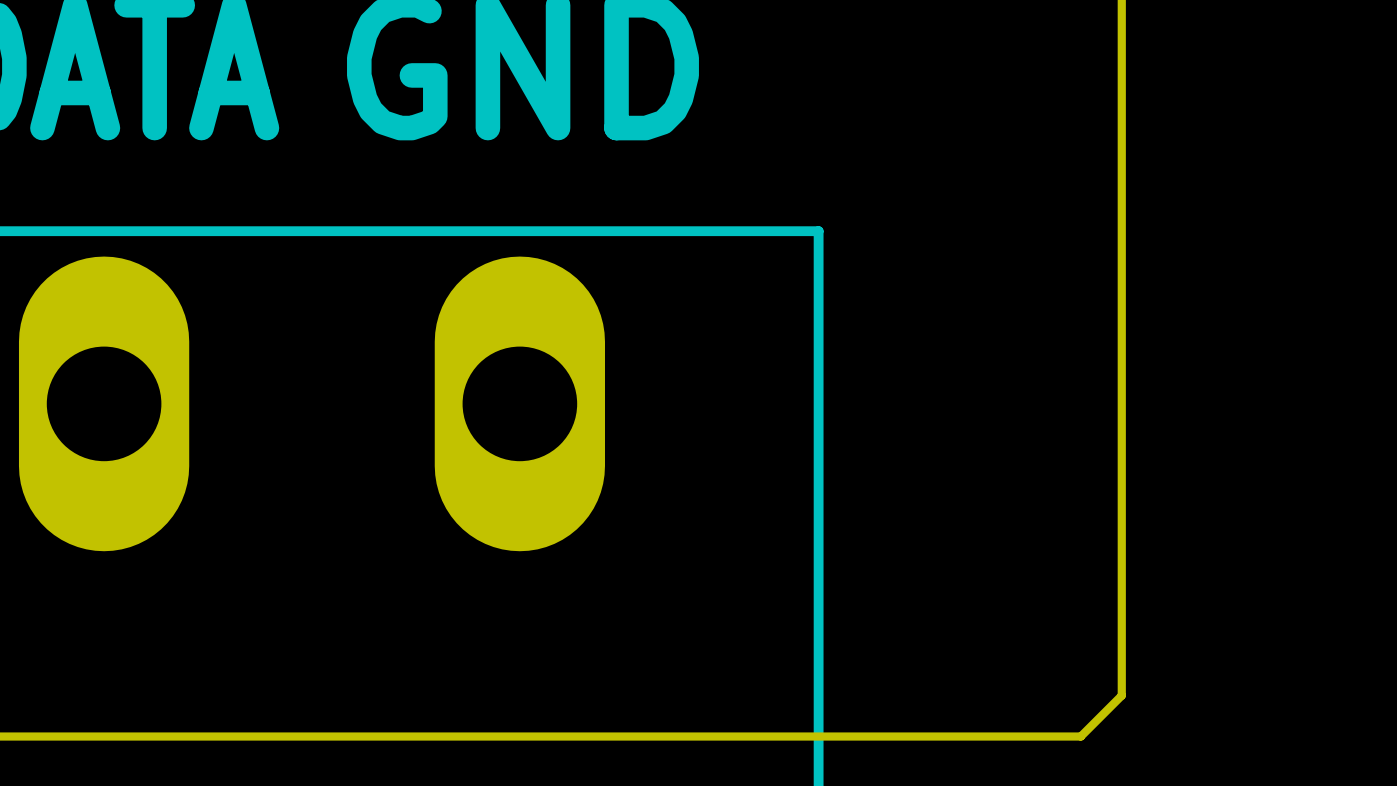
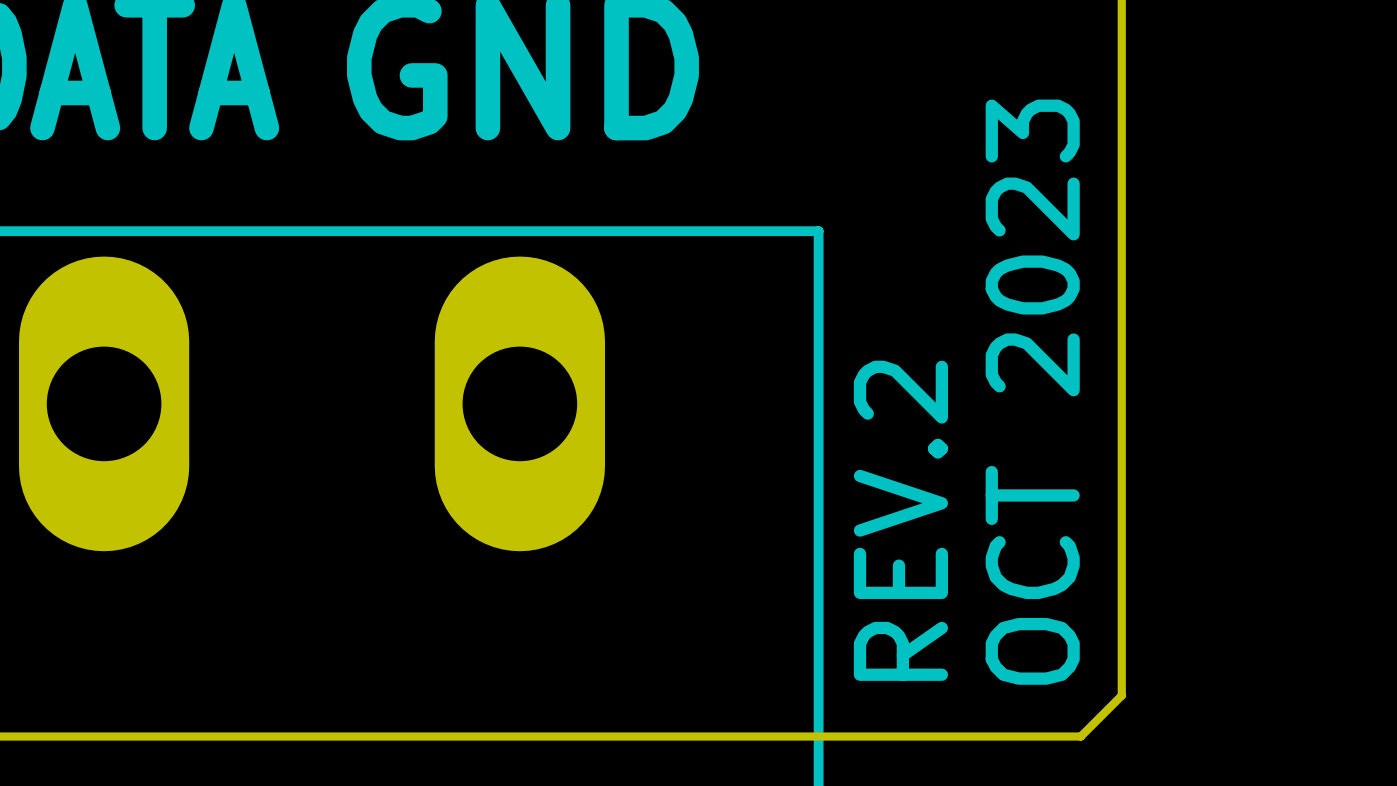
text: none -> OCT 2023 (1032, 392)
text: none -> REV.2 (900, 520)

